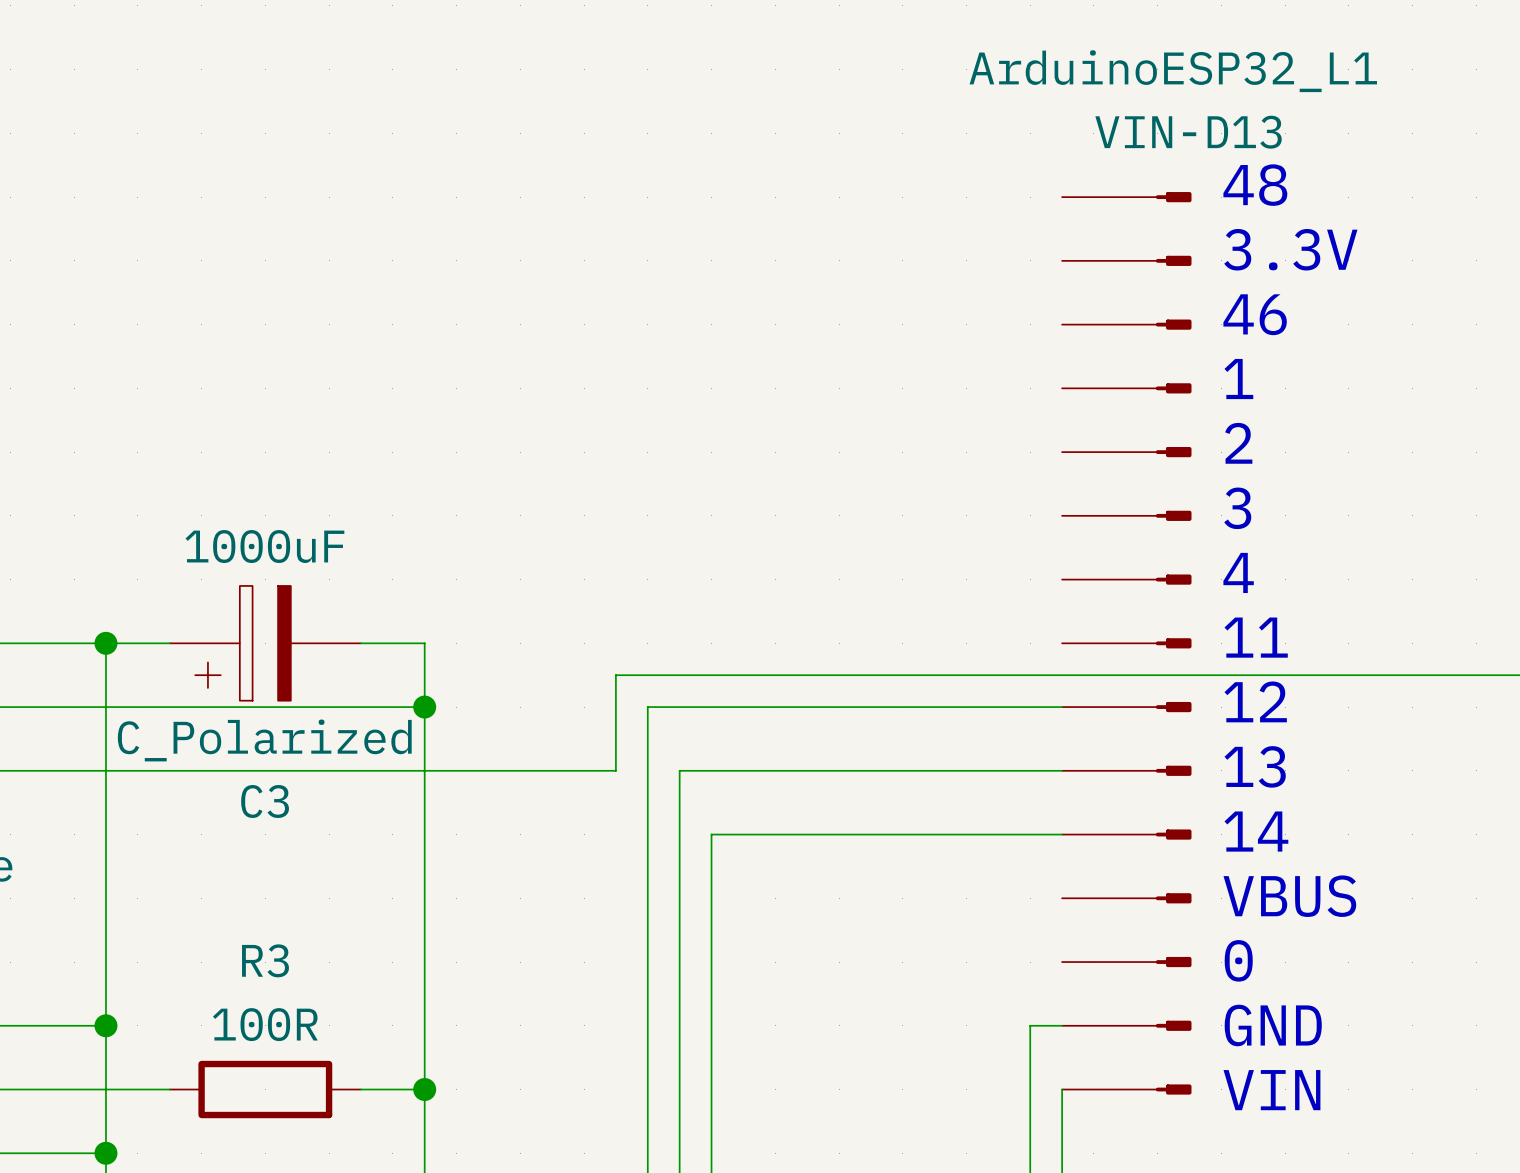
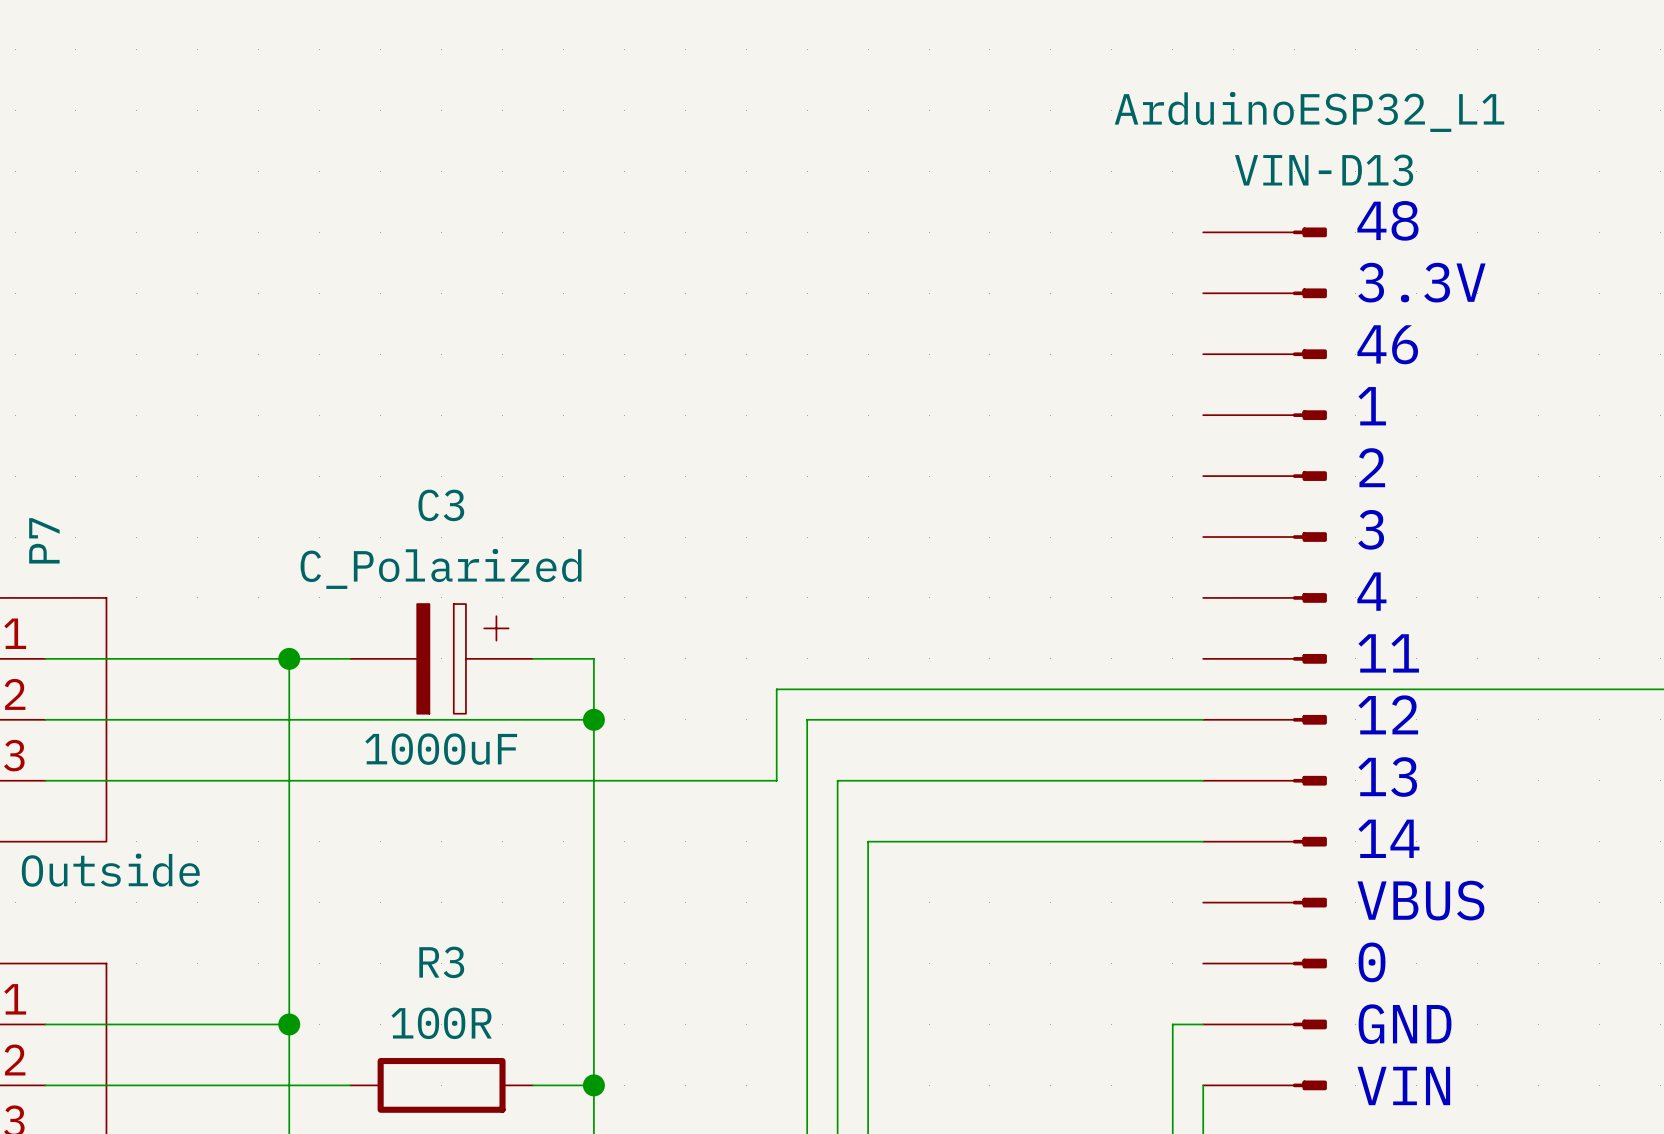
C3 rotation: 0° (243, 643) -> 180° (462, 658)

